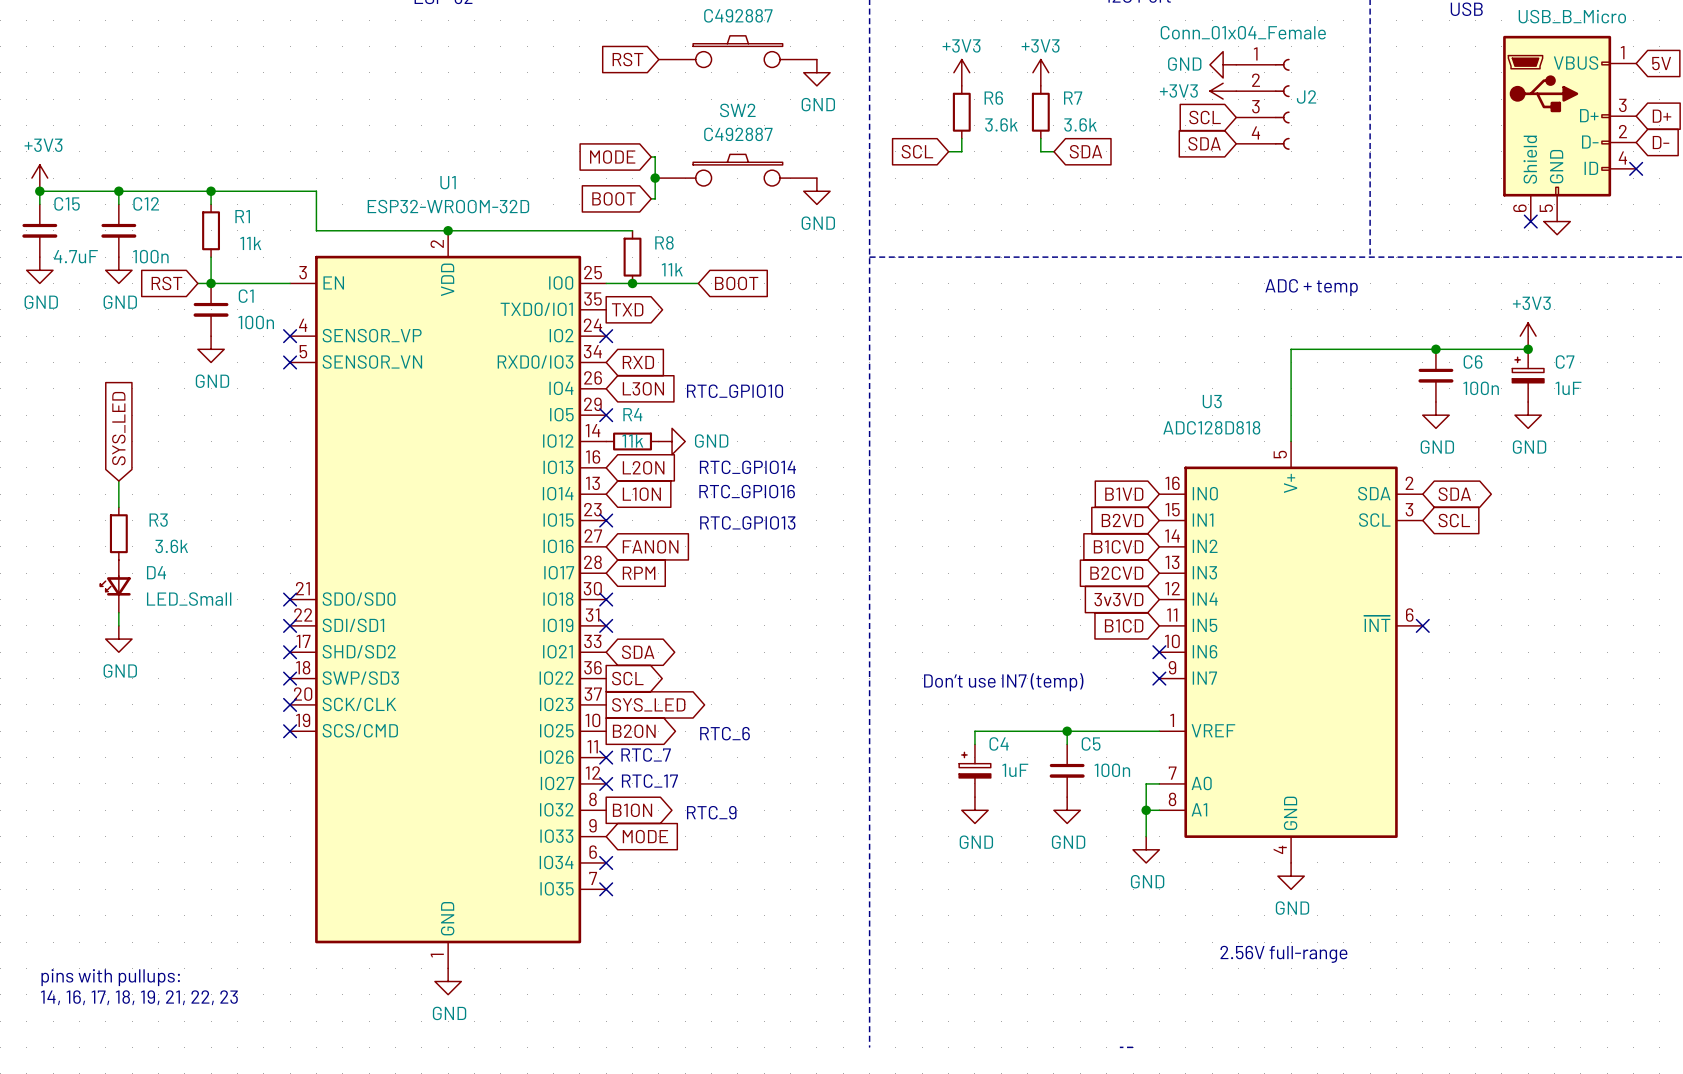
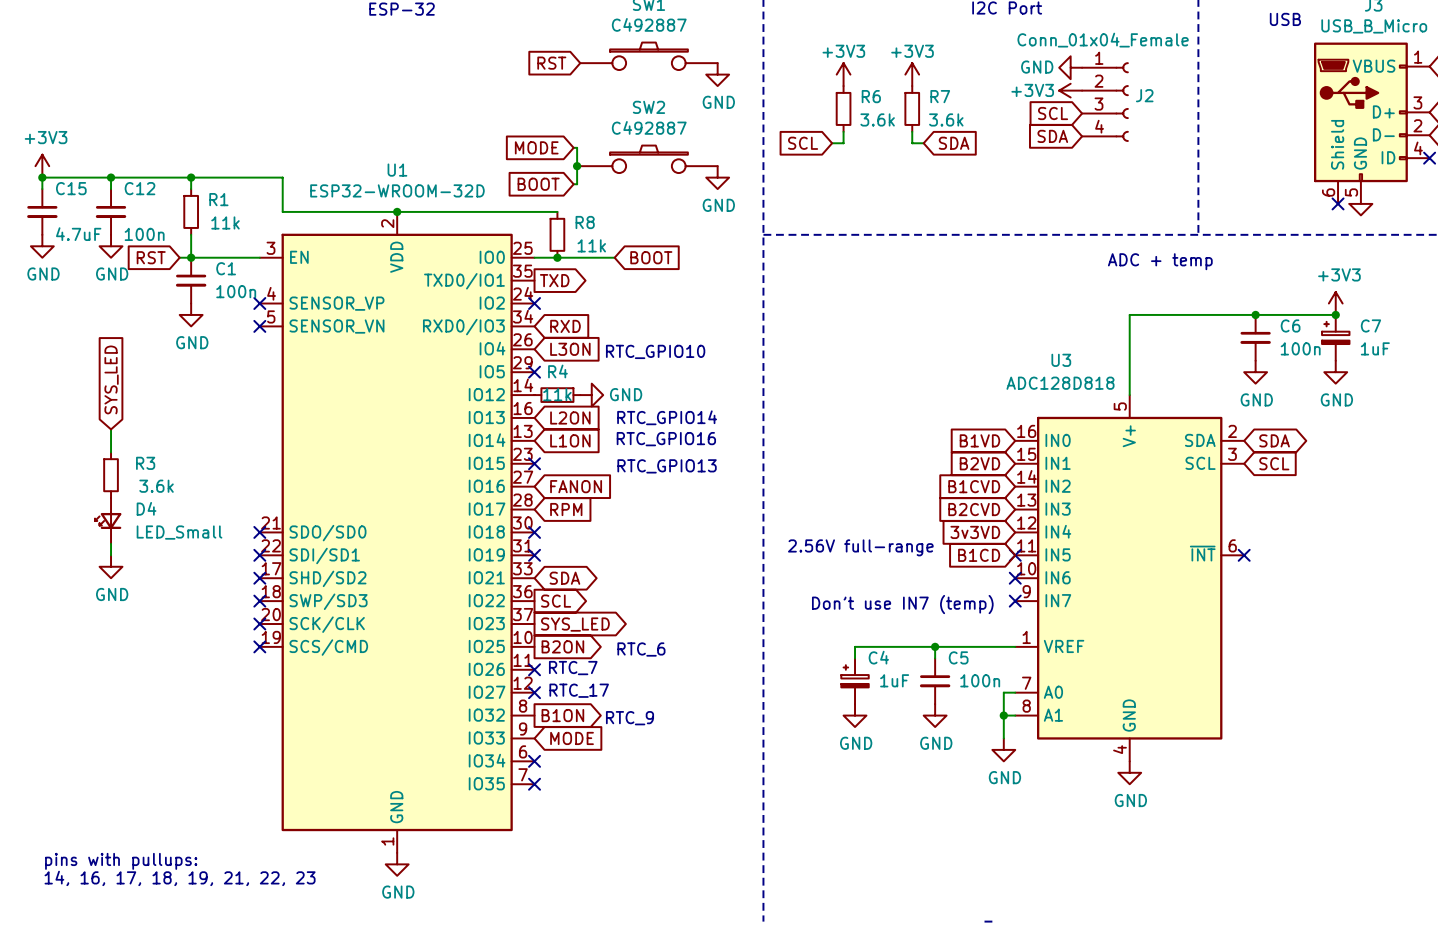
text: none -> 2.56V full-range (860, 547)
no-connect mark: none -> (1015, 555)
text: 2.56V full-range (1283, 954) -> none

